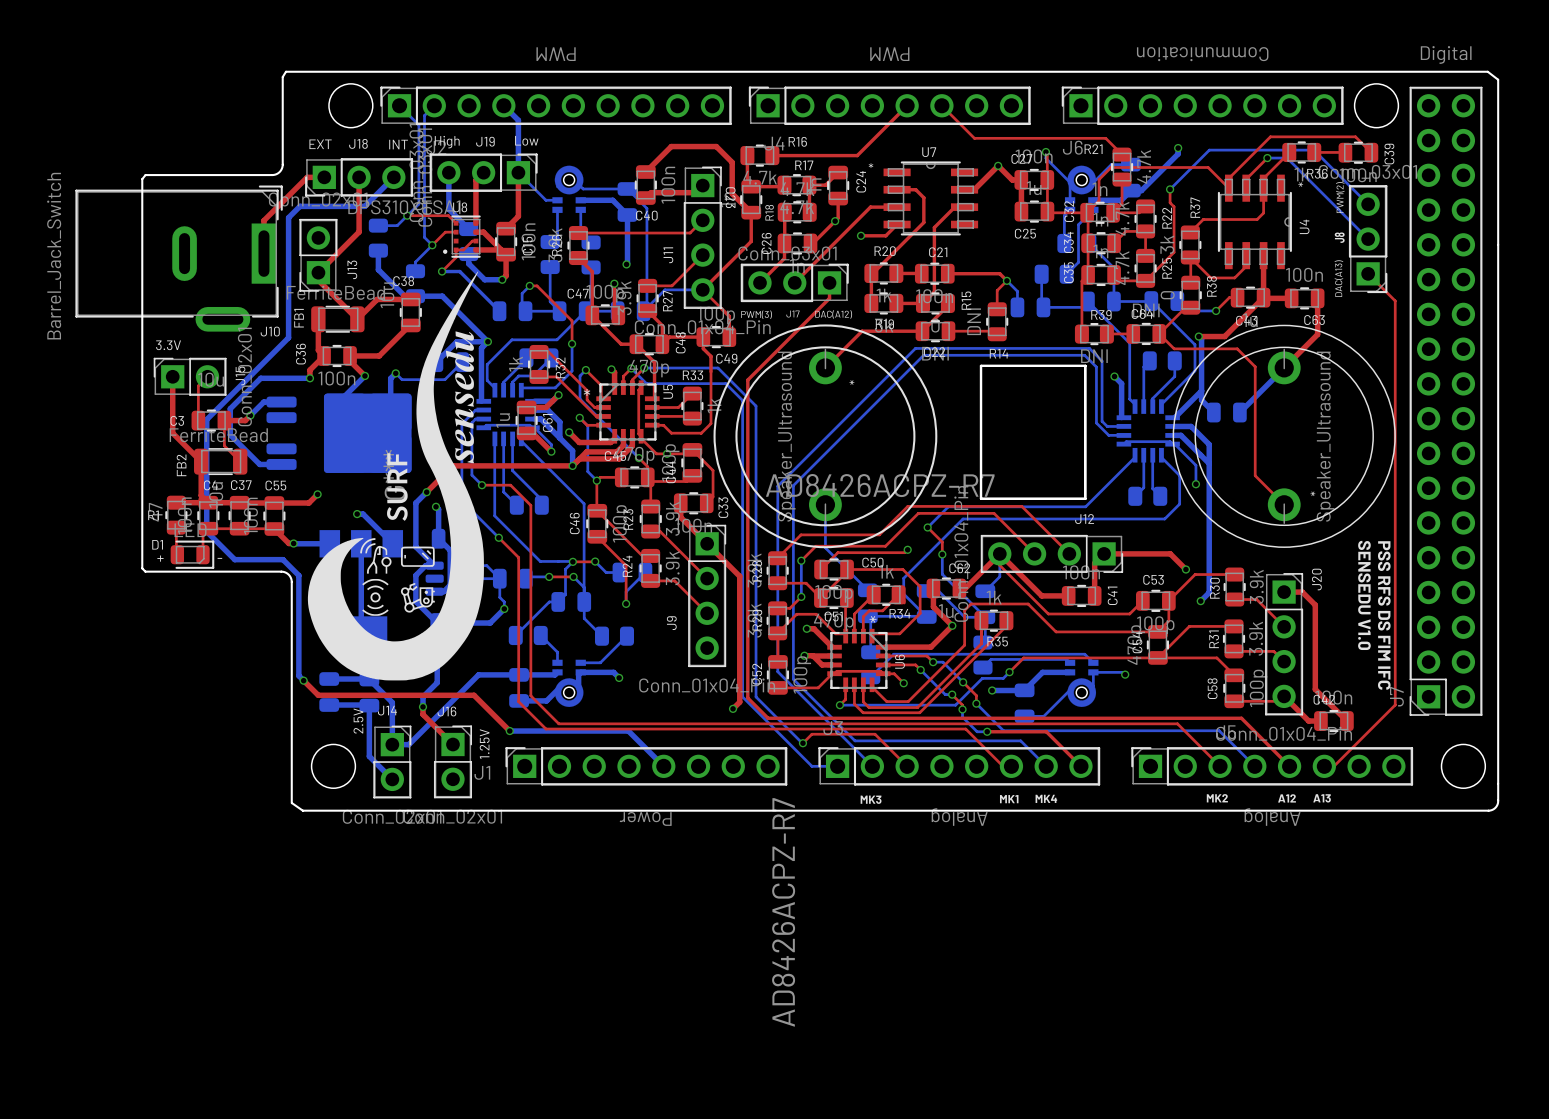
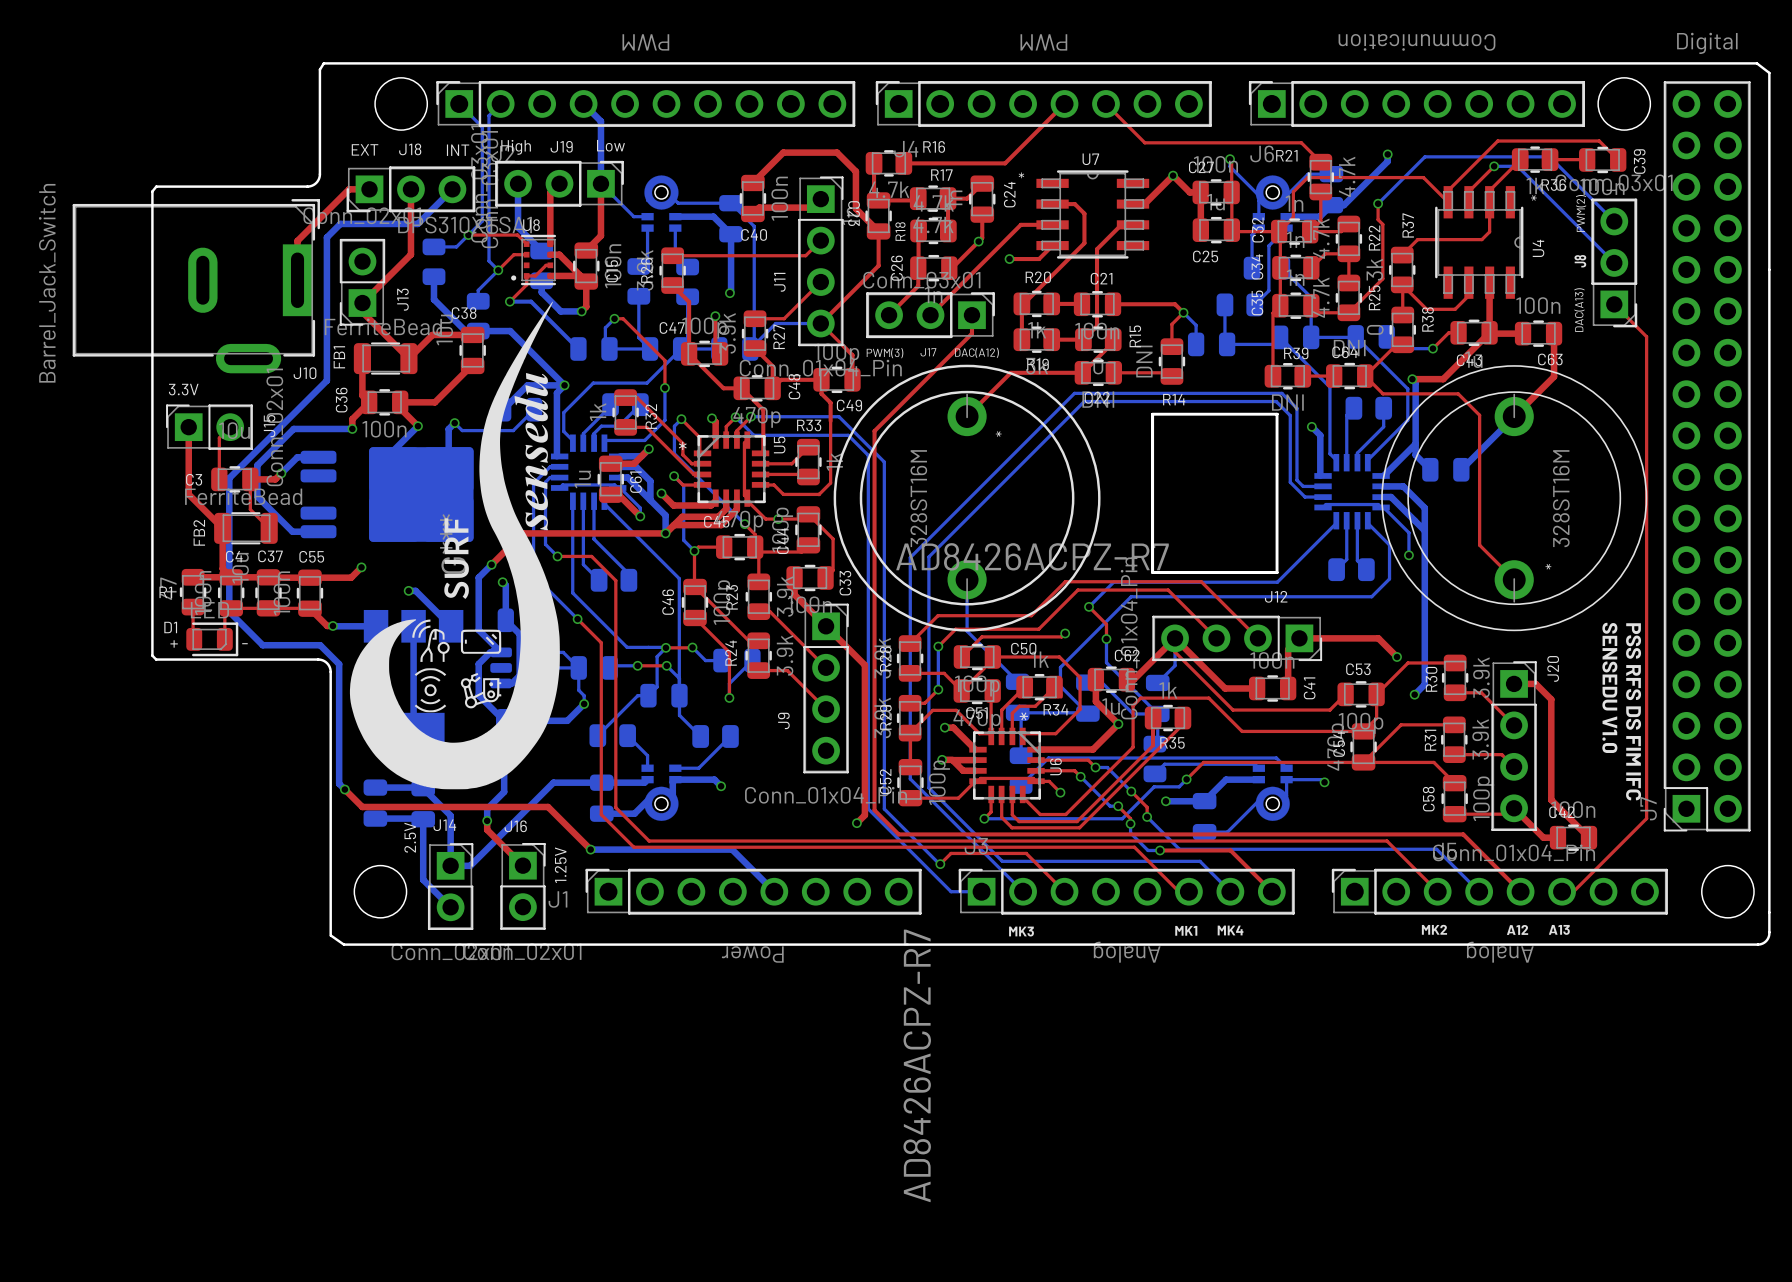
part value: Speaker_Ultrasound (786, 436) -> 328ST16M (918, 498)
part value: Speaker_Ultrasound (1325, 436) -> 328ST16M (1561, 498)

